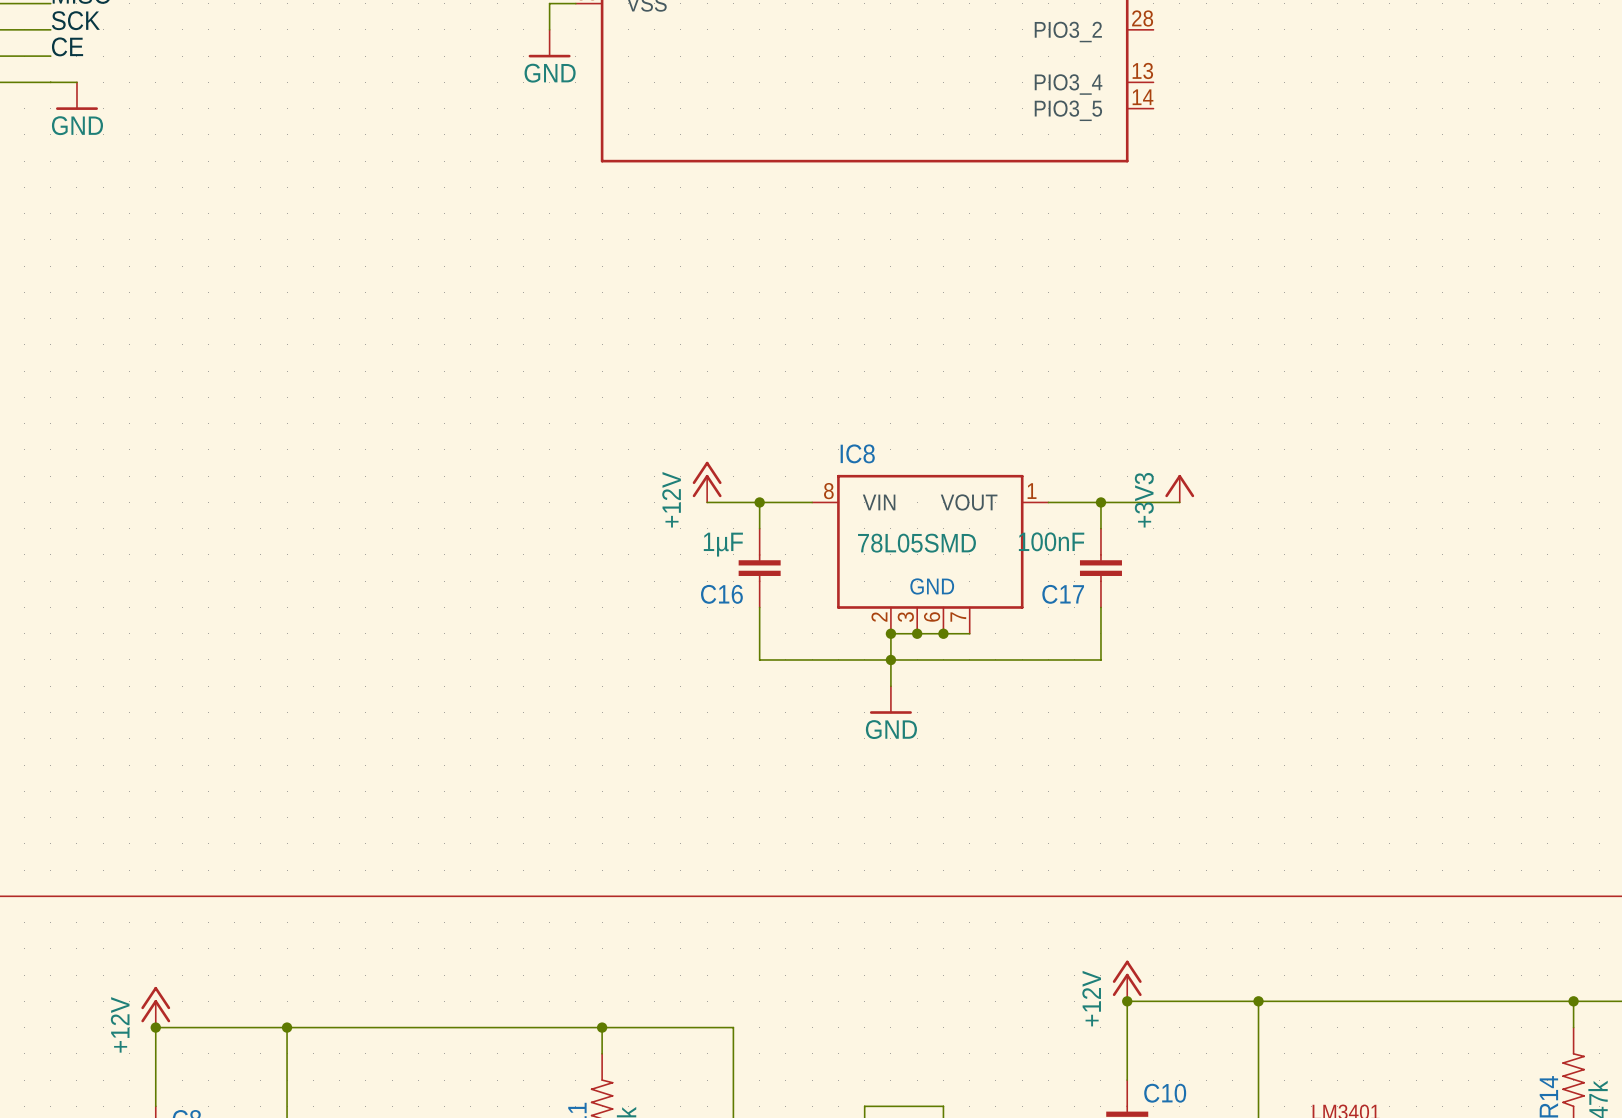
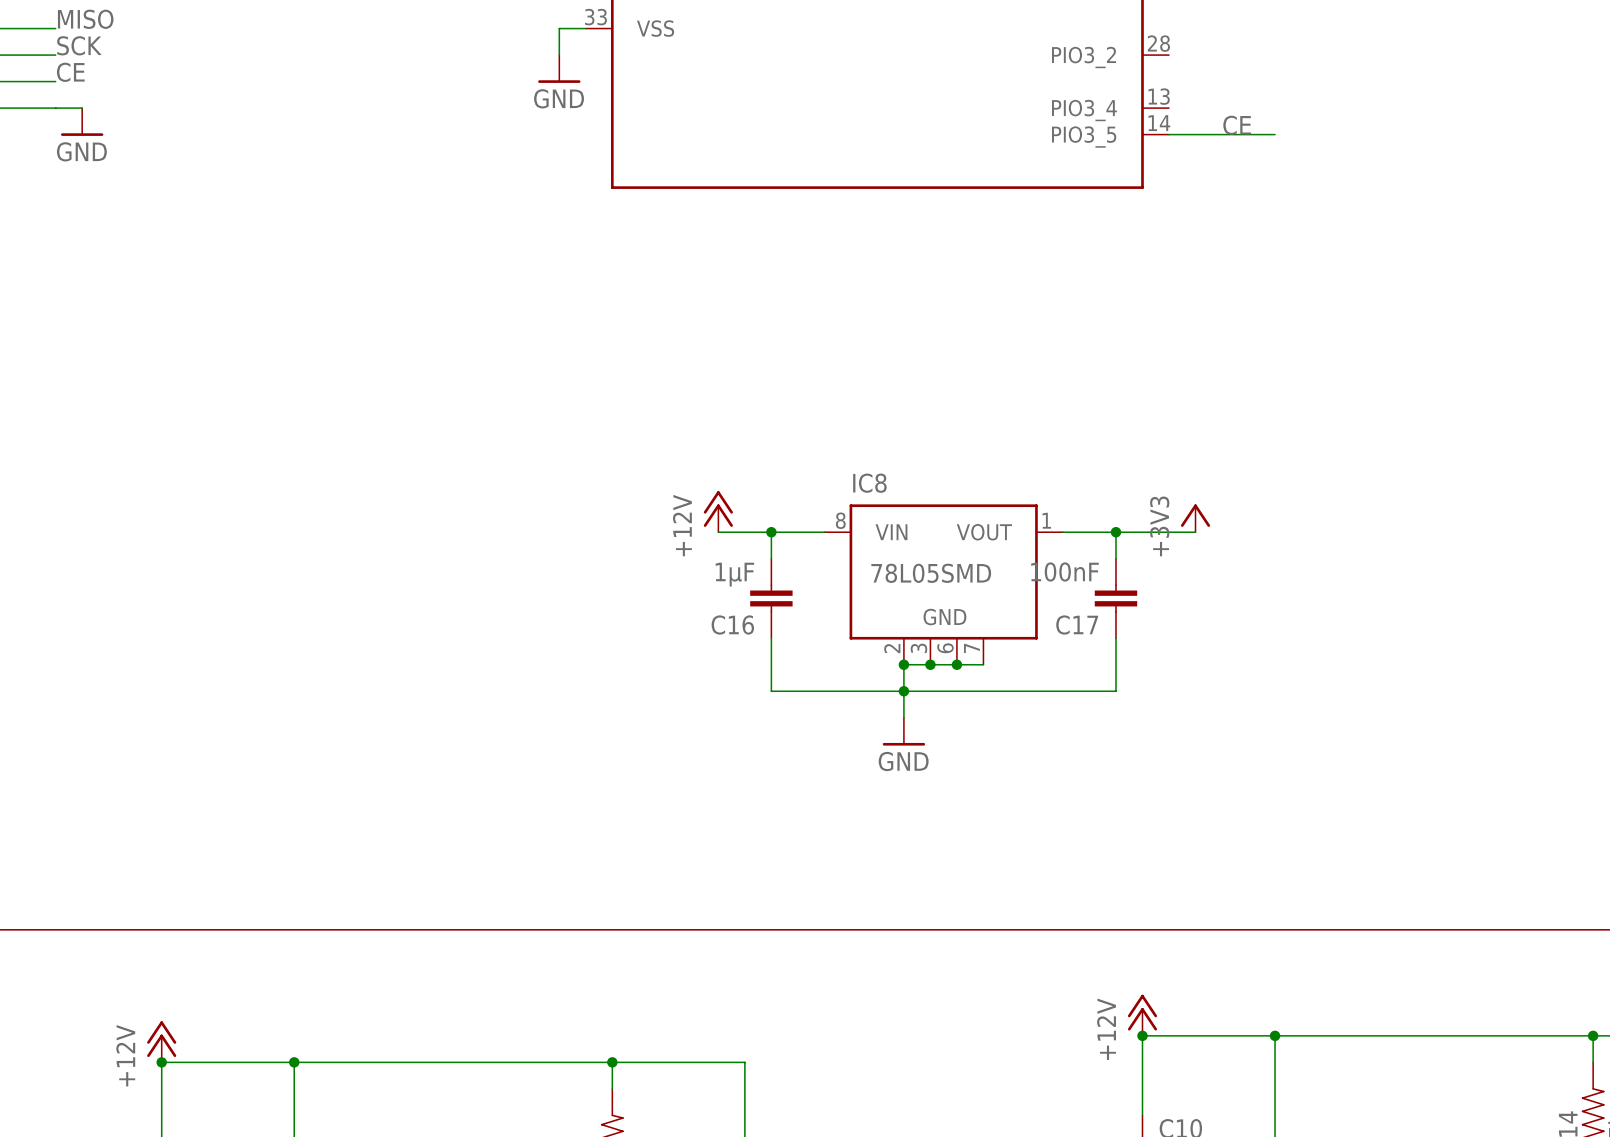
label: none -> CE (1237, 125)
wire: none -> (1169, 134) (1275, 134)

